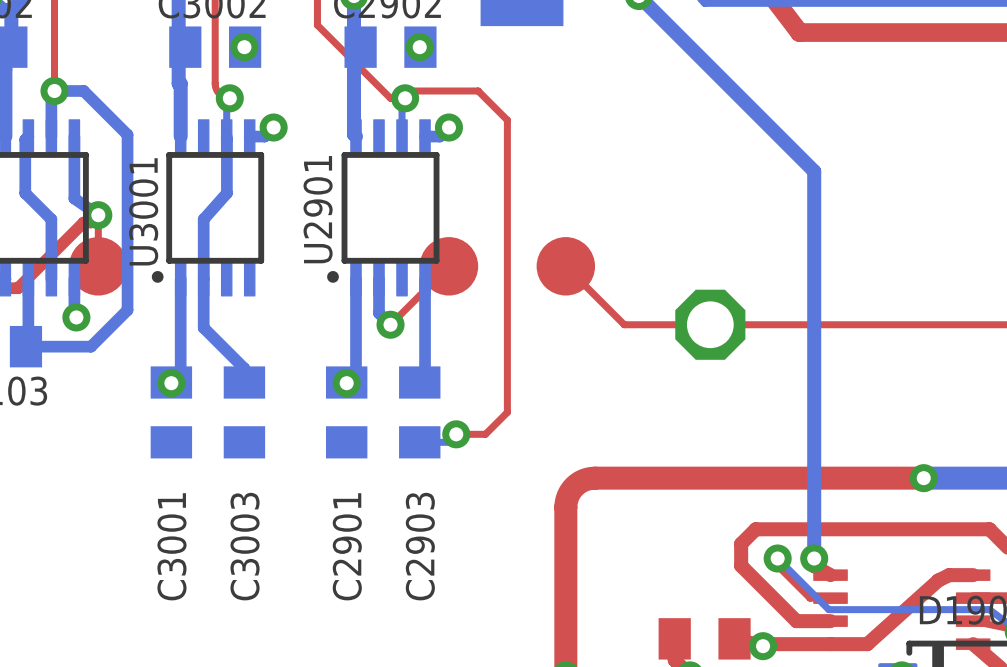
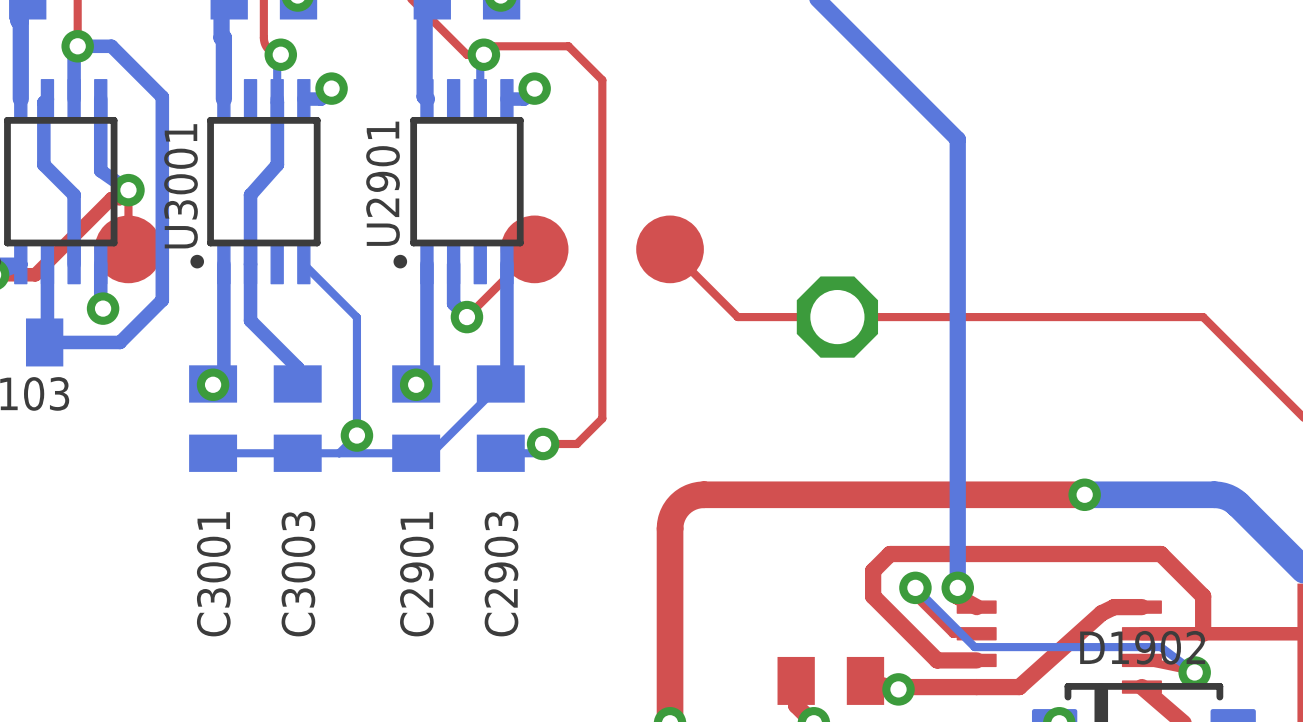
bottom track: none -> (303, 264) (356, 317) (356, 435) (339, 453)
bottom track: none -> (500, 383) (431, 453) (213, 453)
via: none -> (356, 435)

